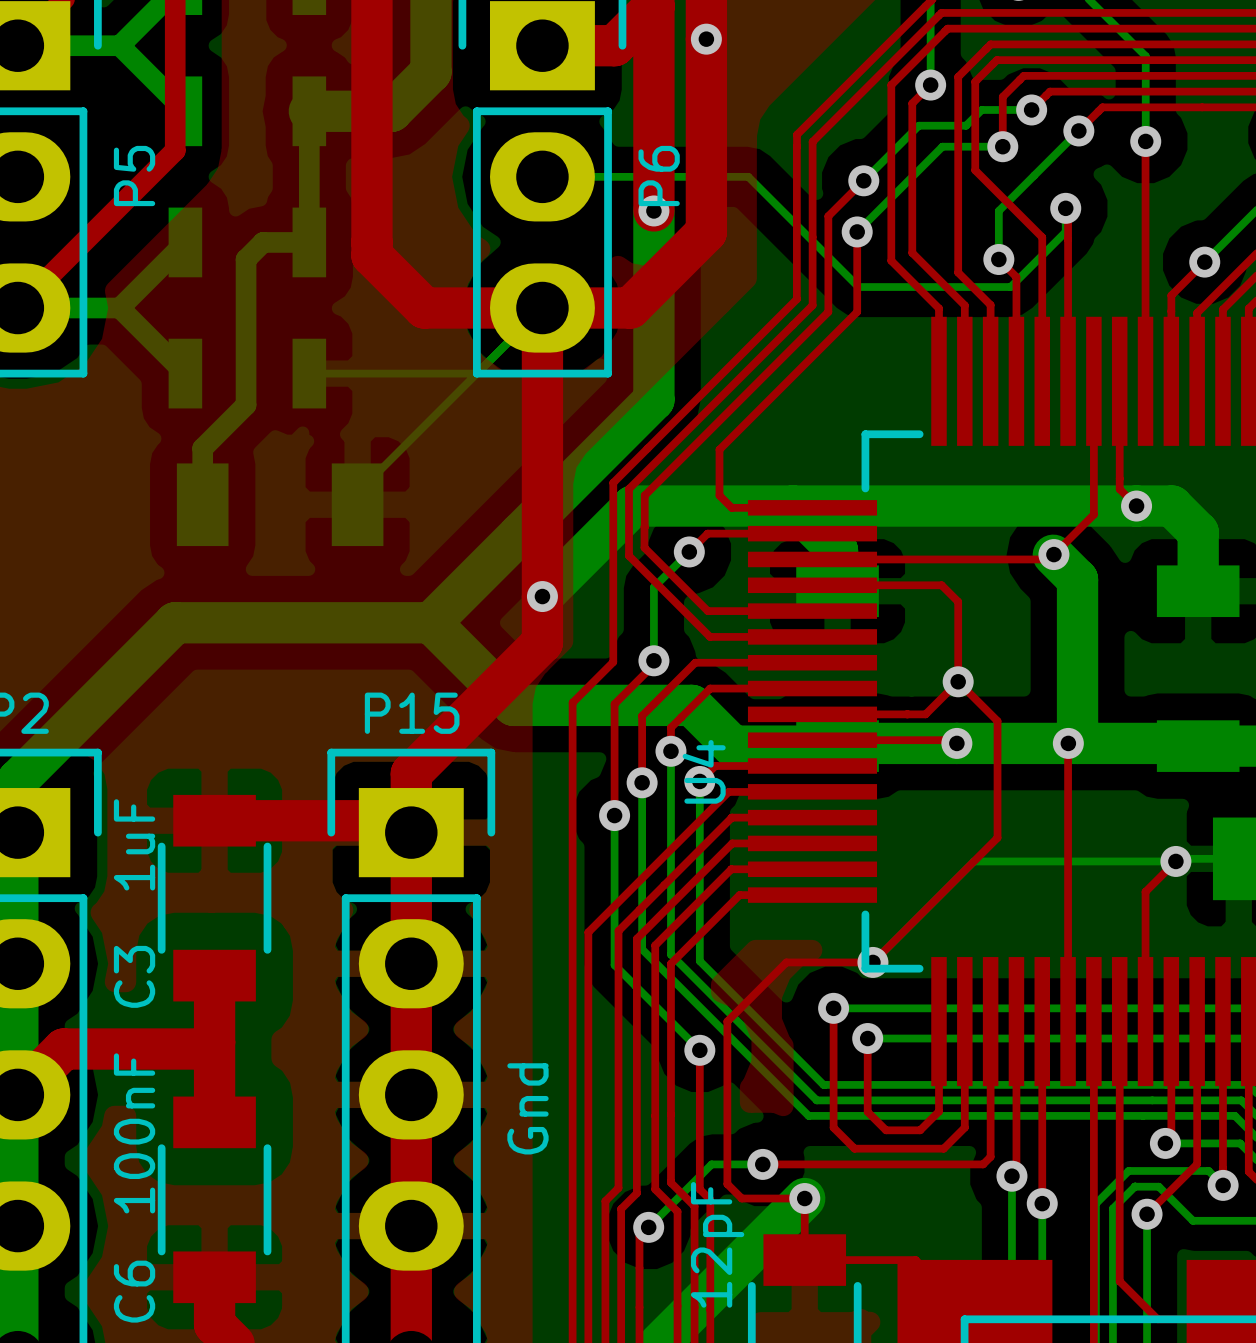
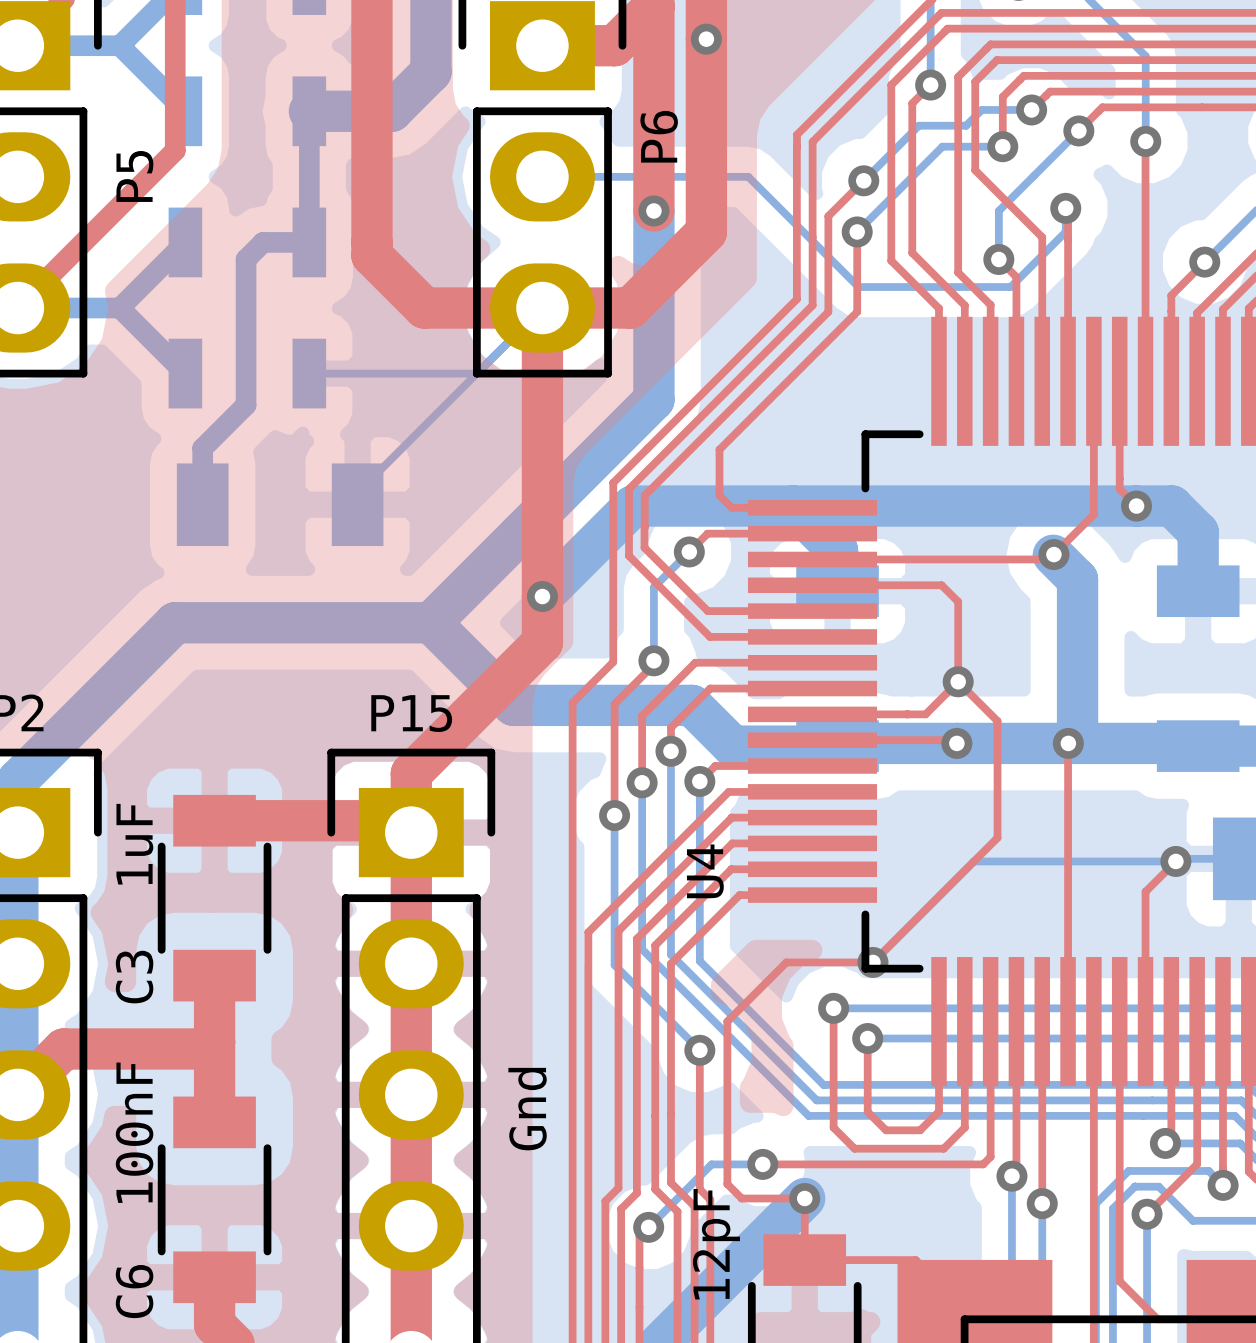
P6 name position: P6 (659, 176) -> P6 (659, 136)
U4 name position: U4 (704, 771) -> U4 (705, 871)

